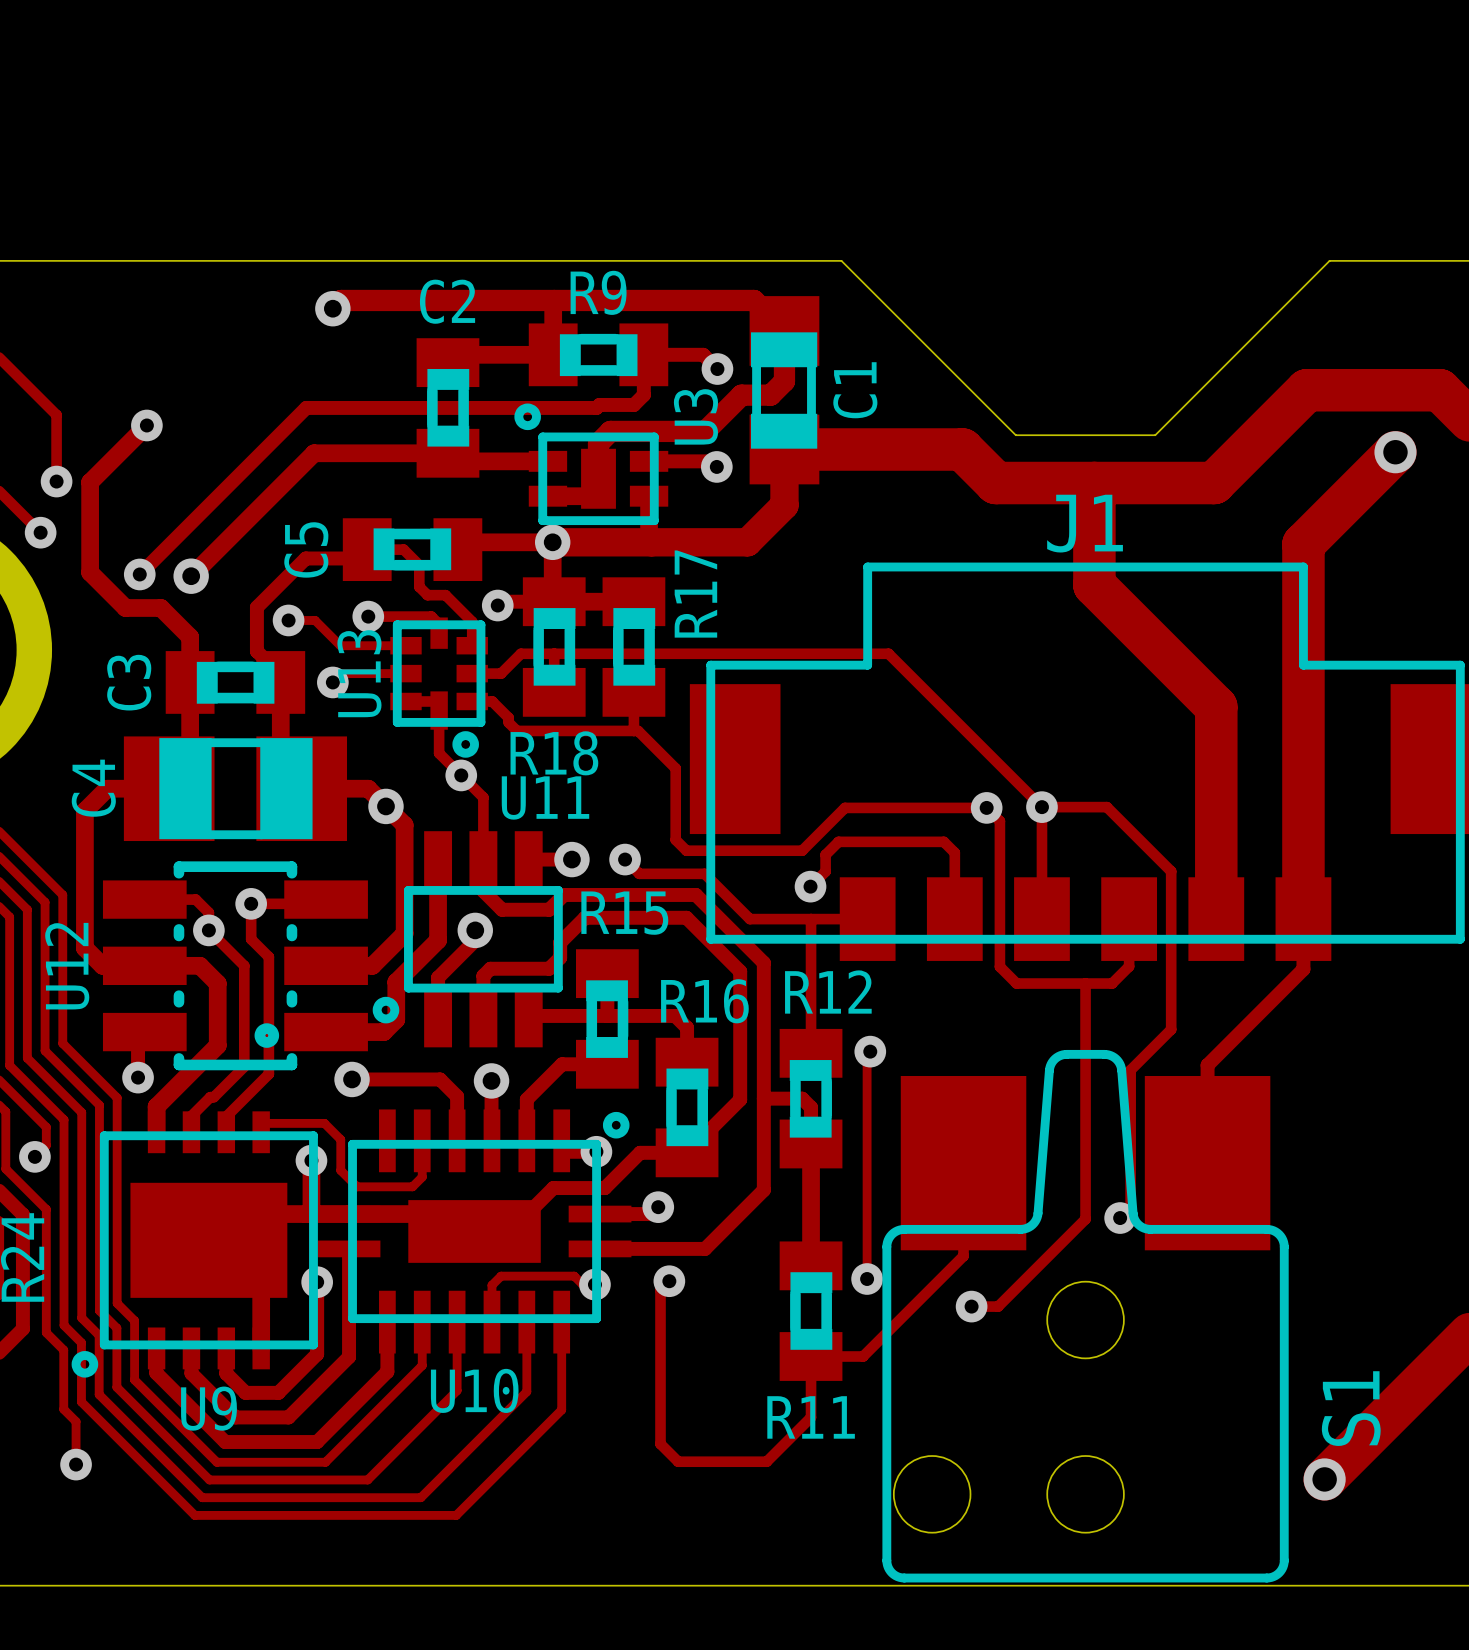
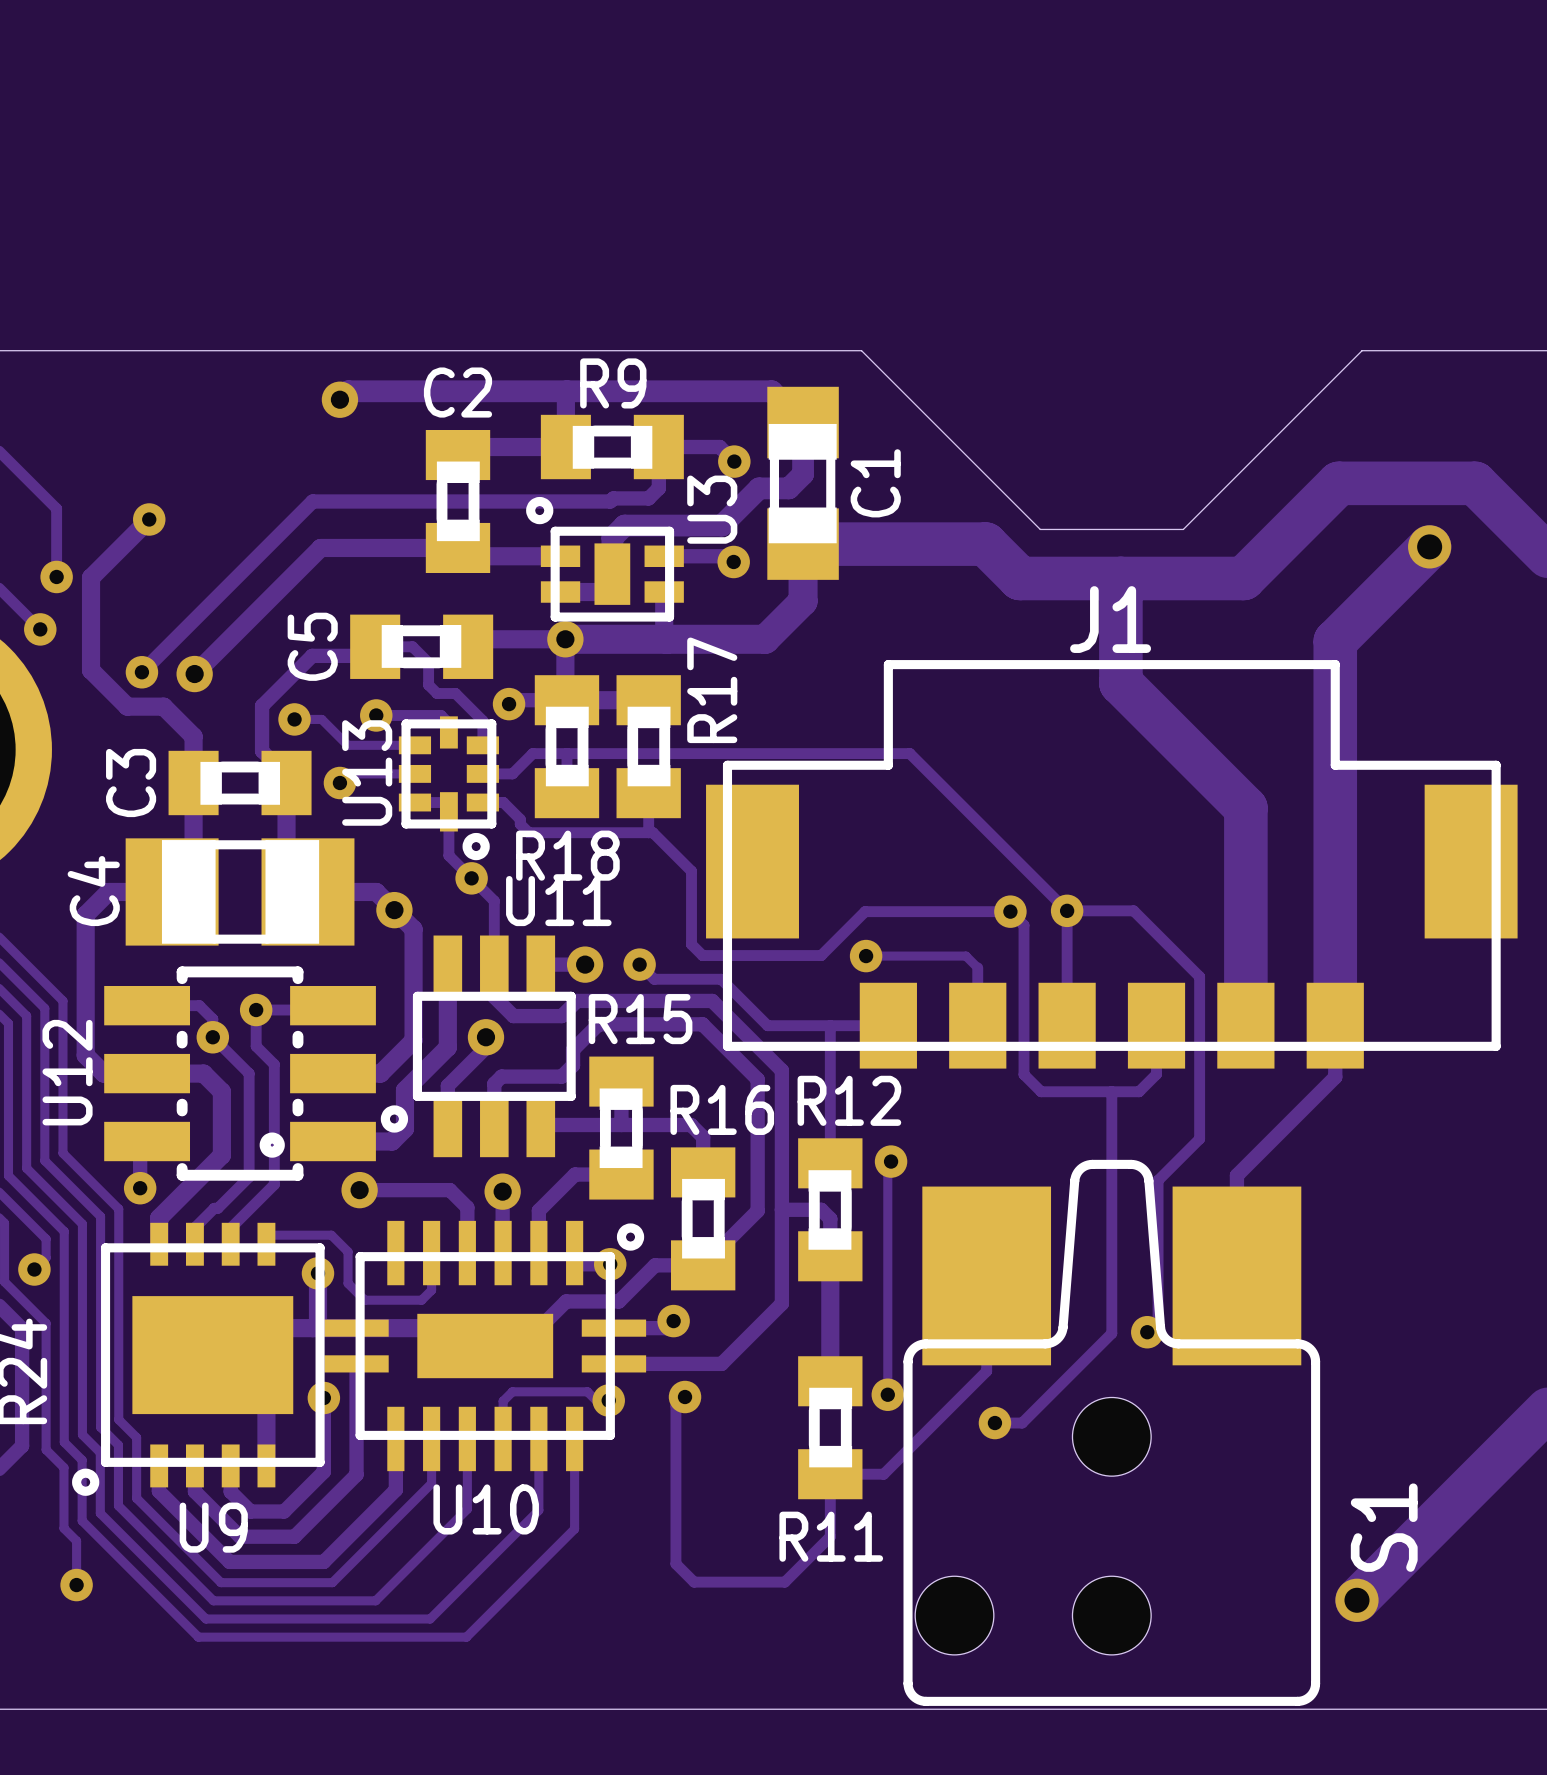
track: (954, 862) (954, 852) (943, 841) (838, 841) (825, 854) (825, 871) (810, 886) -> (977, 967) (965, 956) (866, 956)
via position: (810, 886) -> (866, 956)

